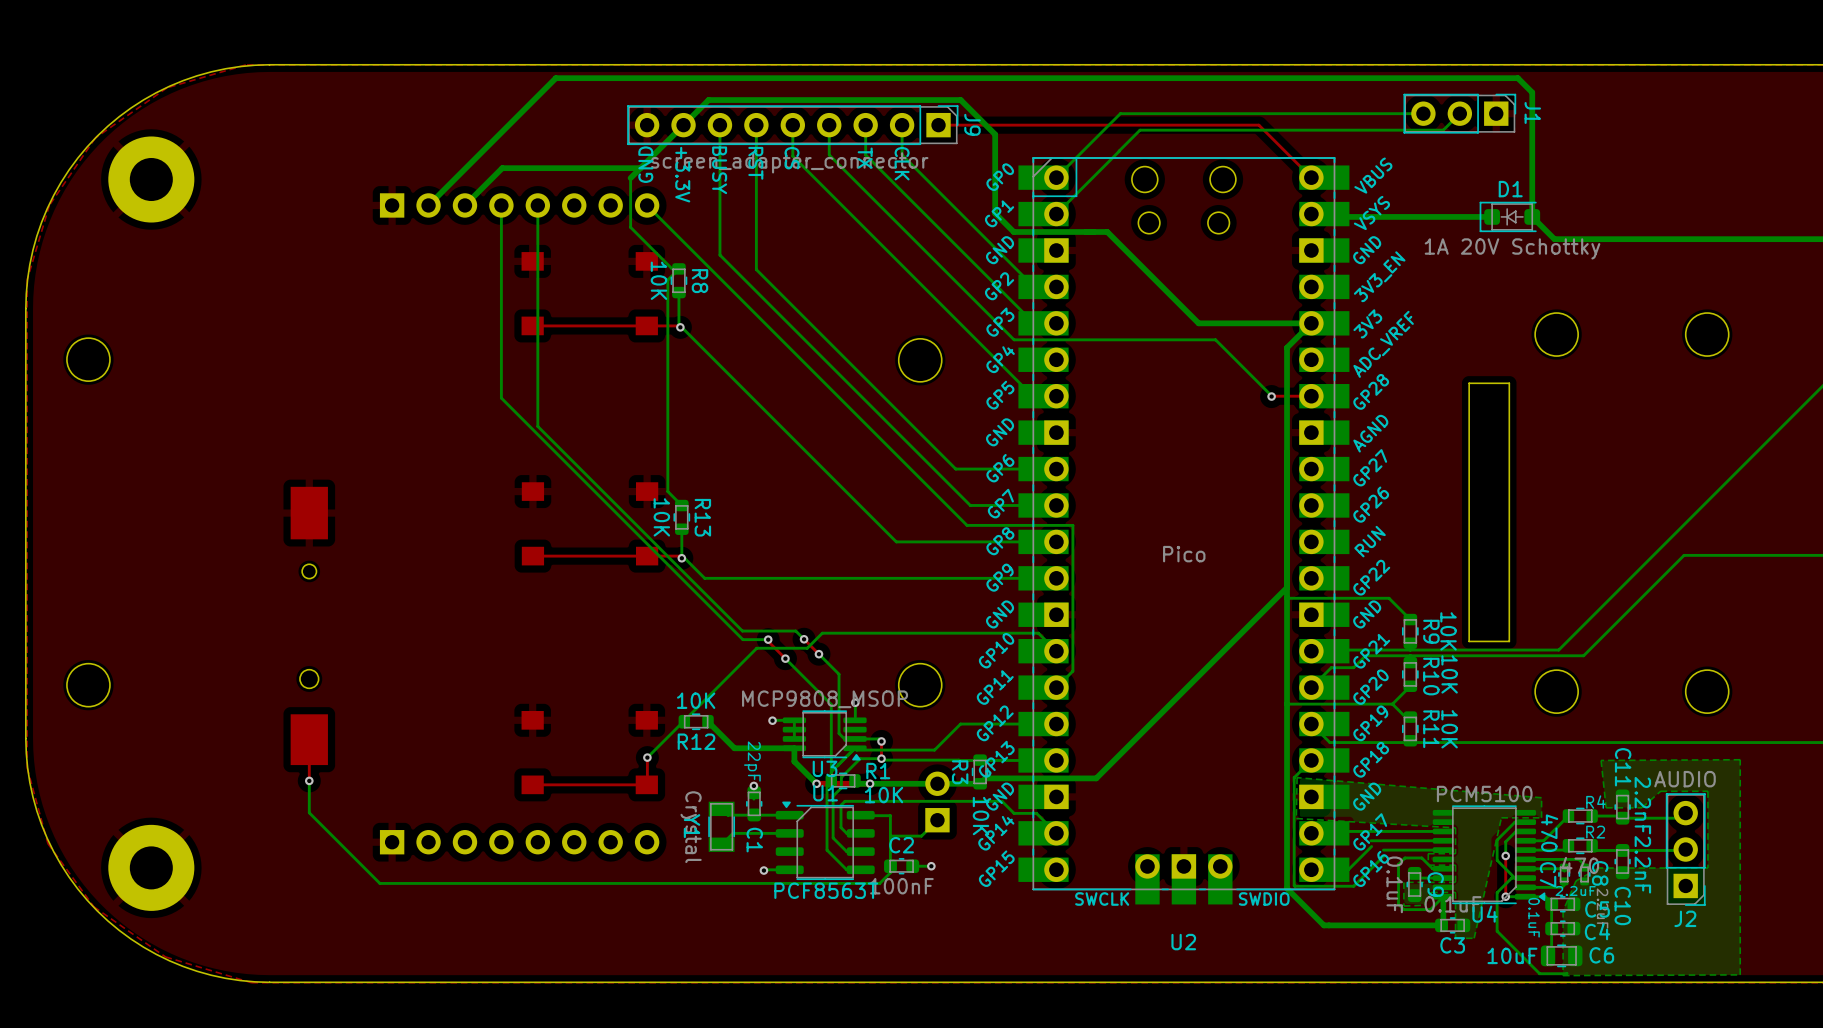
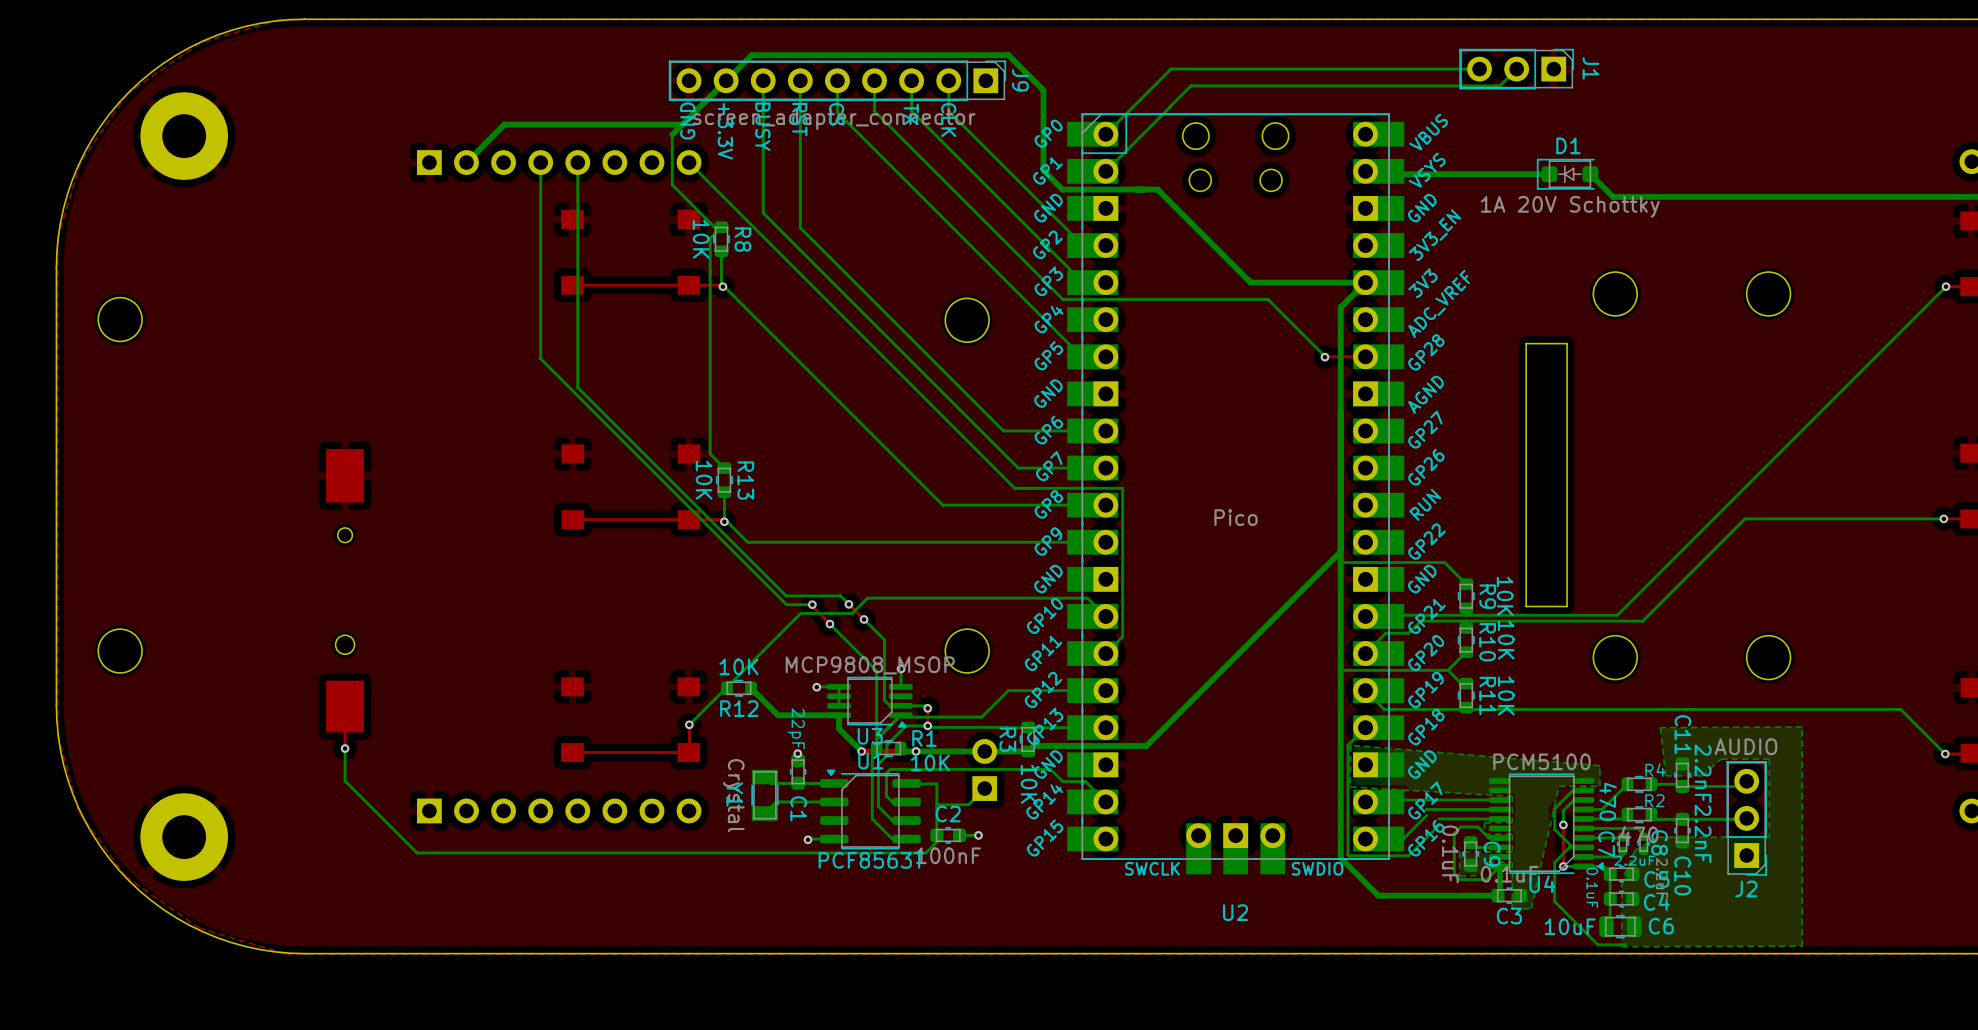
top track: (938, 125) (1258, 125) (1311, 177) -> none
bottom track: (465, 168) (555, 78) (1517, 78) (1532, 92) (1532, 216) -> none
bottom track: (502, 168) (464, 205) -> (541, 124) (504, 124)

